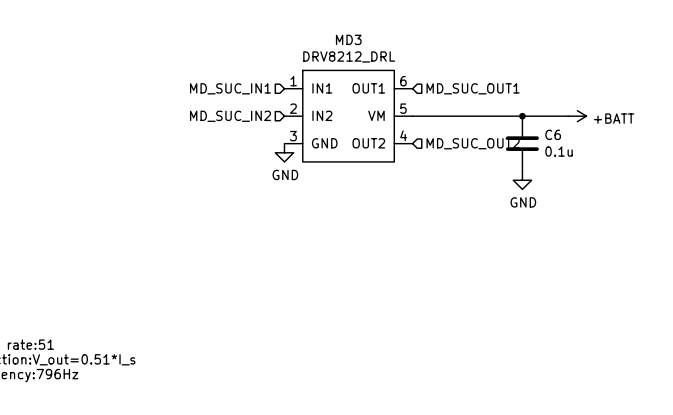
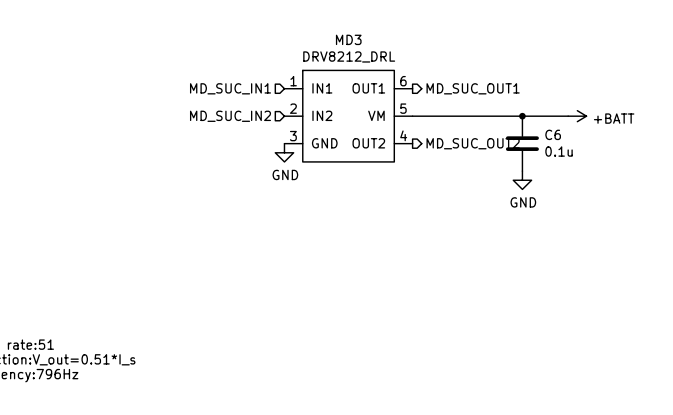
hierarchical label shape: input (473, 88) -> output (473, 88)
hierarchical label shape: input (473, 143) -> output (473, 143)

